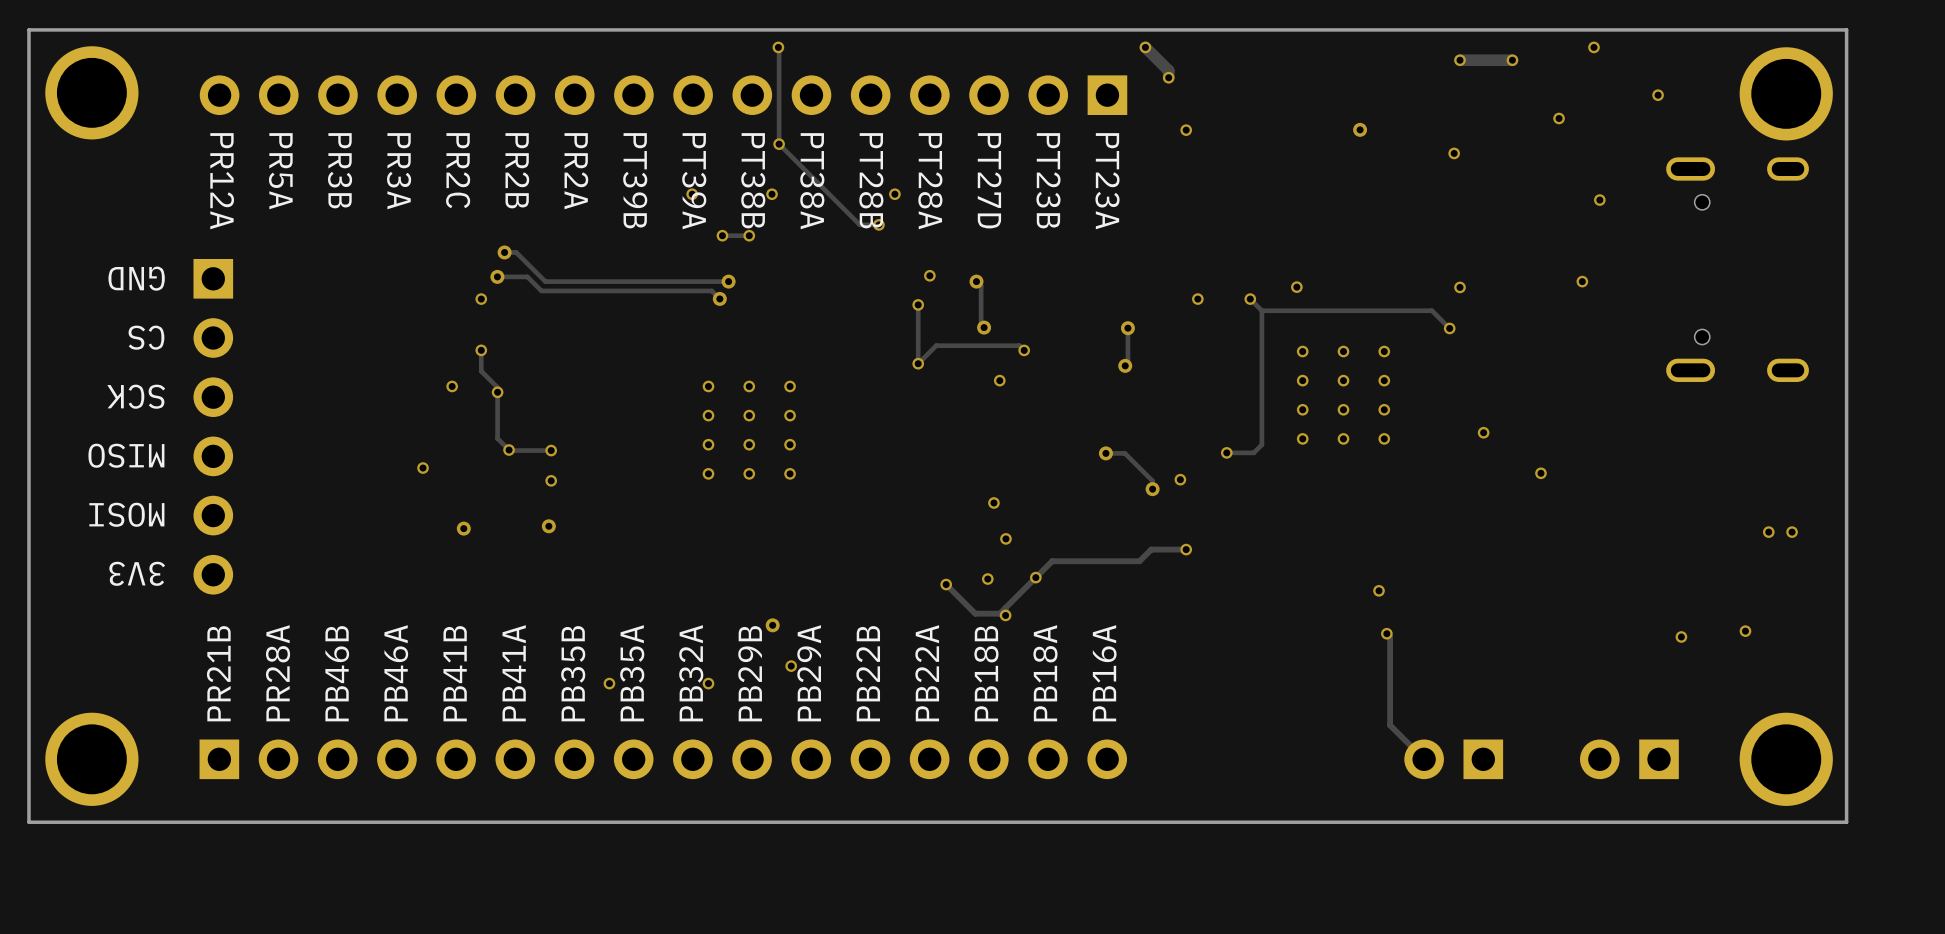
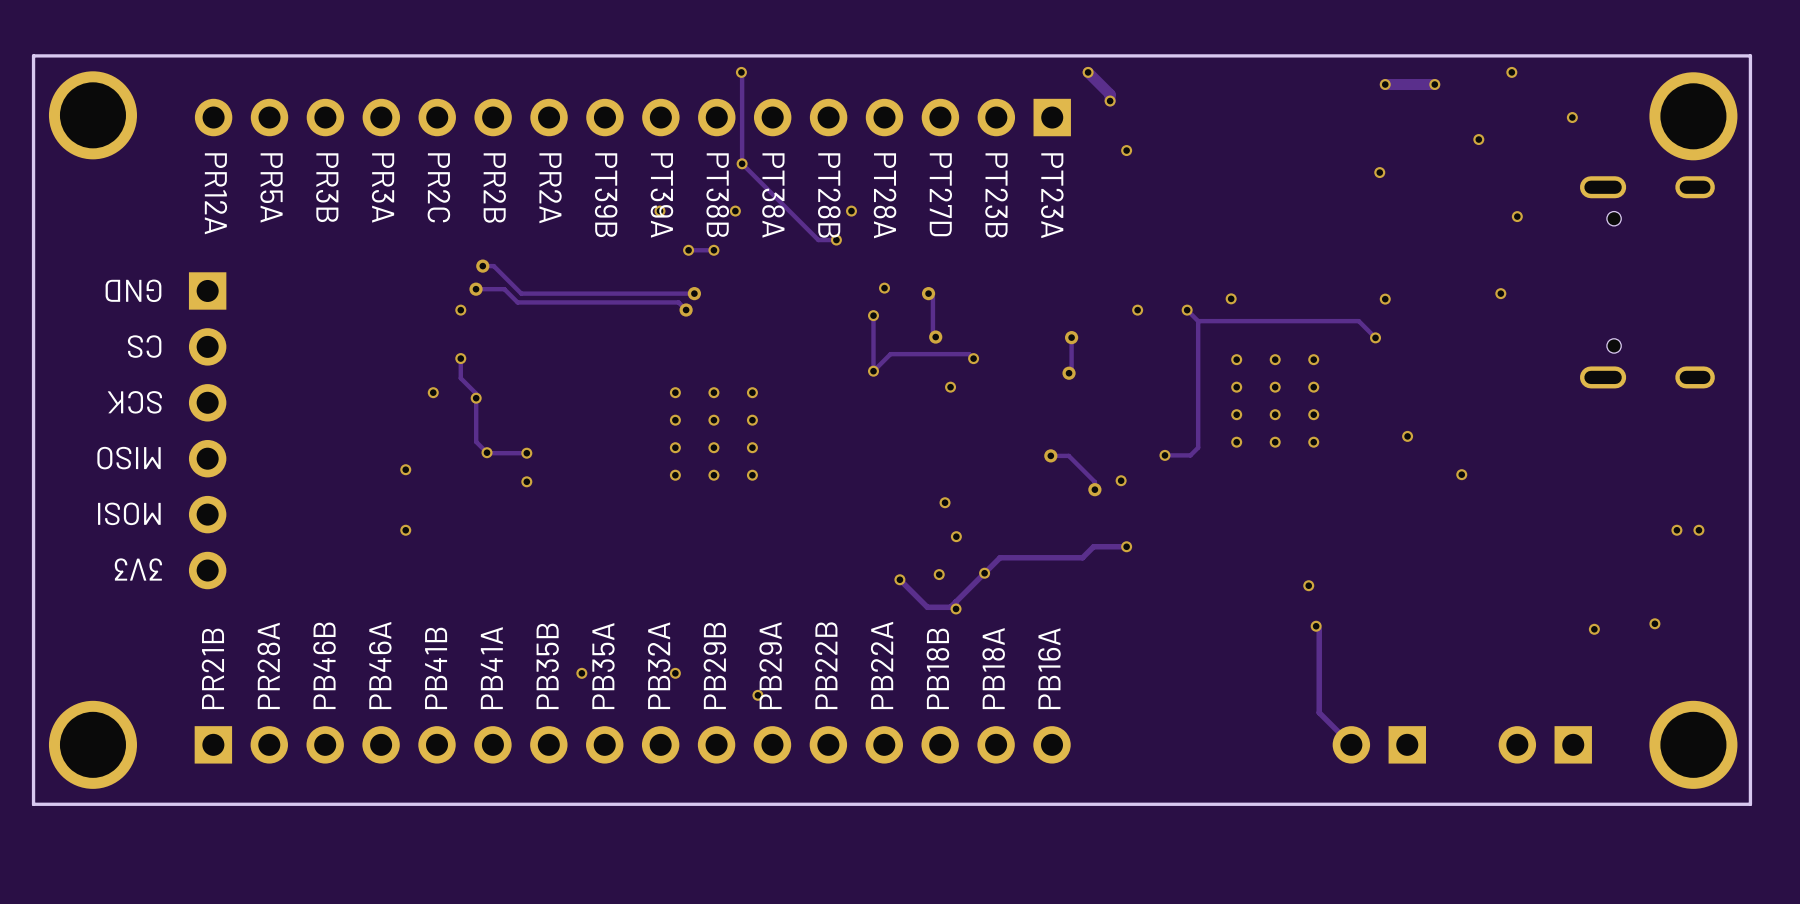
via: (1360, 129) -> none
via: (548, 526) -> none
via: (463, 528) -> none
via: none -> (405, 530)
via: (772, 625) -> none
via position: (791, 666) -> (757, 695)

